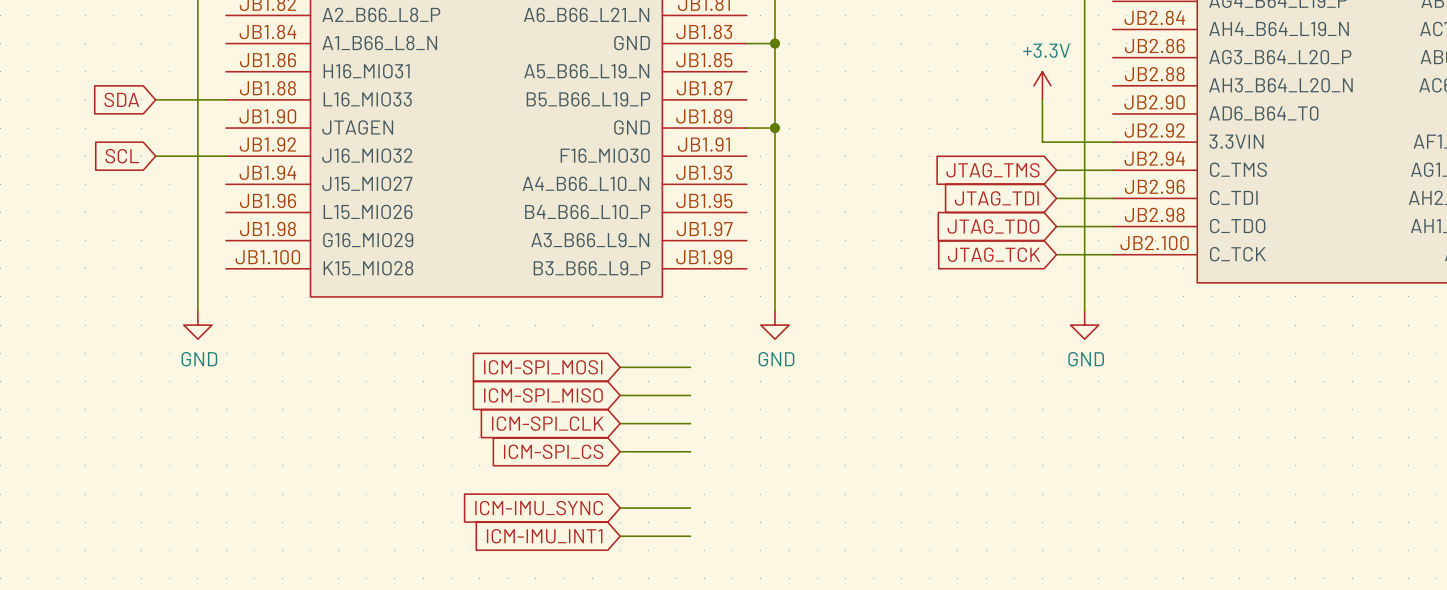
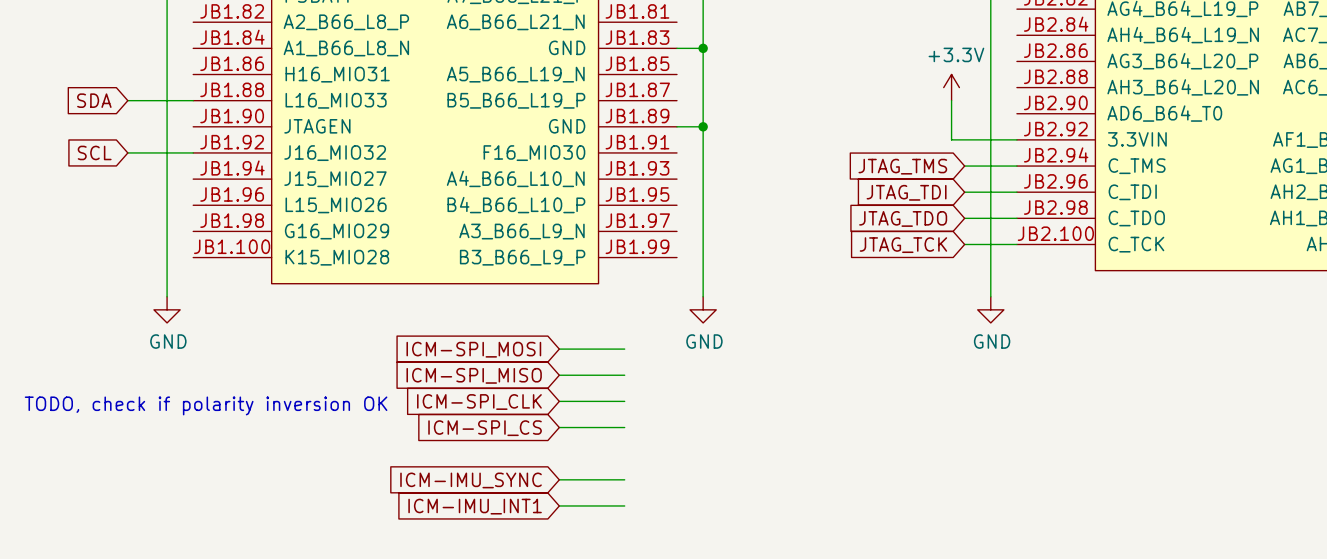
text: none -> TODO, check if polarity inversion OK (206, 405)

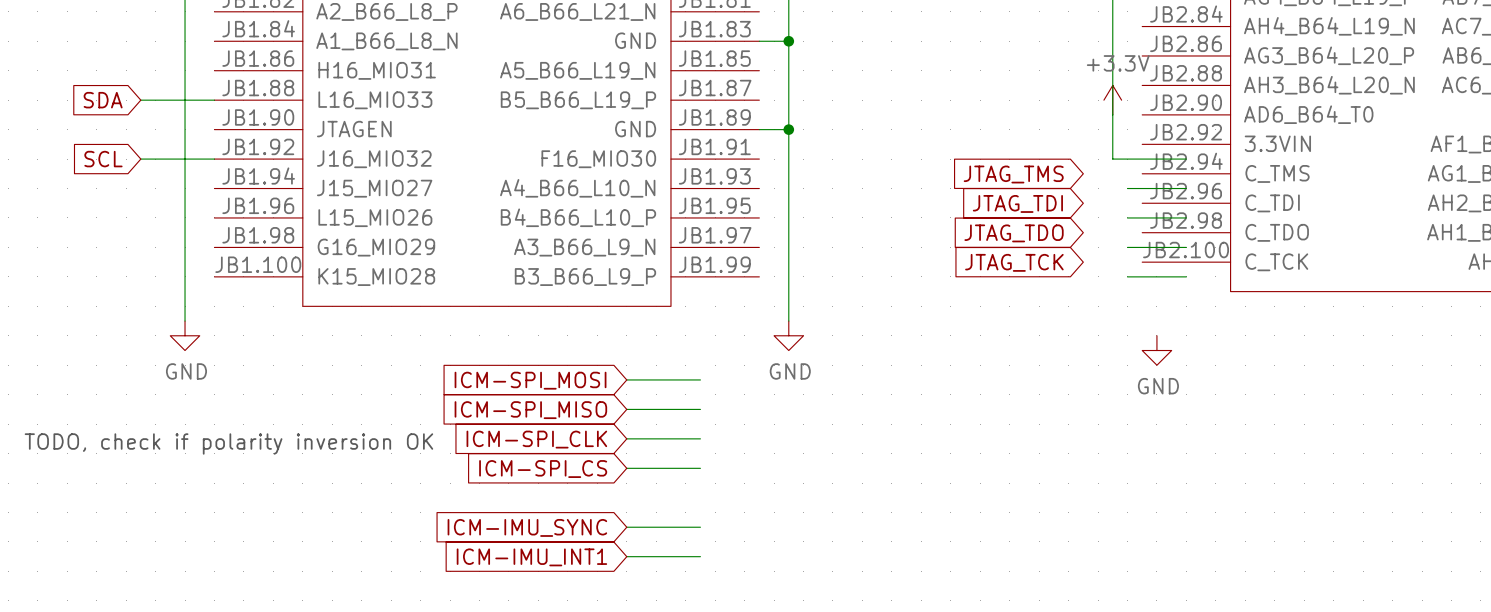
power symbol position: +3.3V (951, 87) -> +3.3V (1112, 100)
wire: (951, 100) (951, 139) (1016, 139) -> none
wire: (990, 152) (990, 296) -> (1112, 159) (1186, 159)
wire: (964, 166) (1016, 166) -> (1127, 188) (1186, 188)
wire: (964, 192) (1016, 192) -> (1127, 217) (1186, 217)
wire: (964, 218) (1016, 218) -> (1127, 247) (1186, 247)
wire: (964, 244) (1016, 244) -> (1127, 276) (1186, 276)
power symbol position: GND (990, 309) -> GND (1156, 350)

